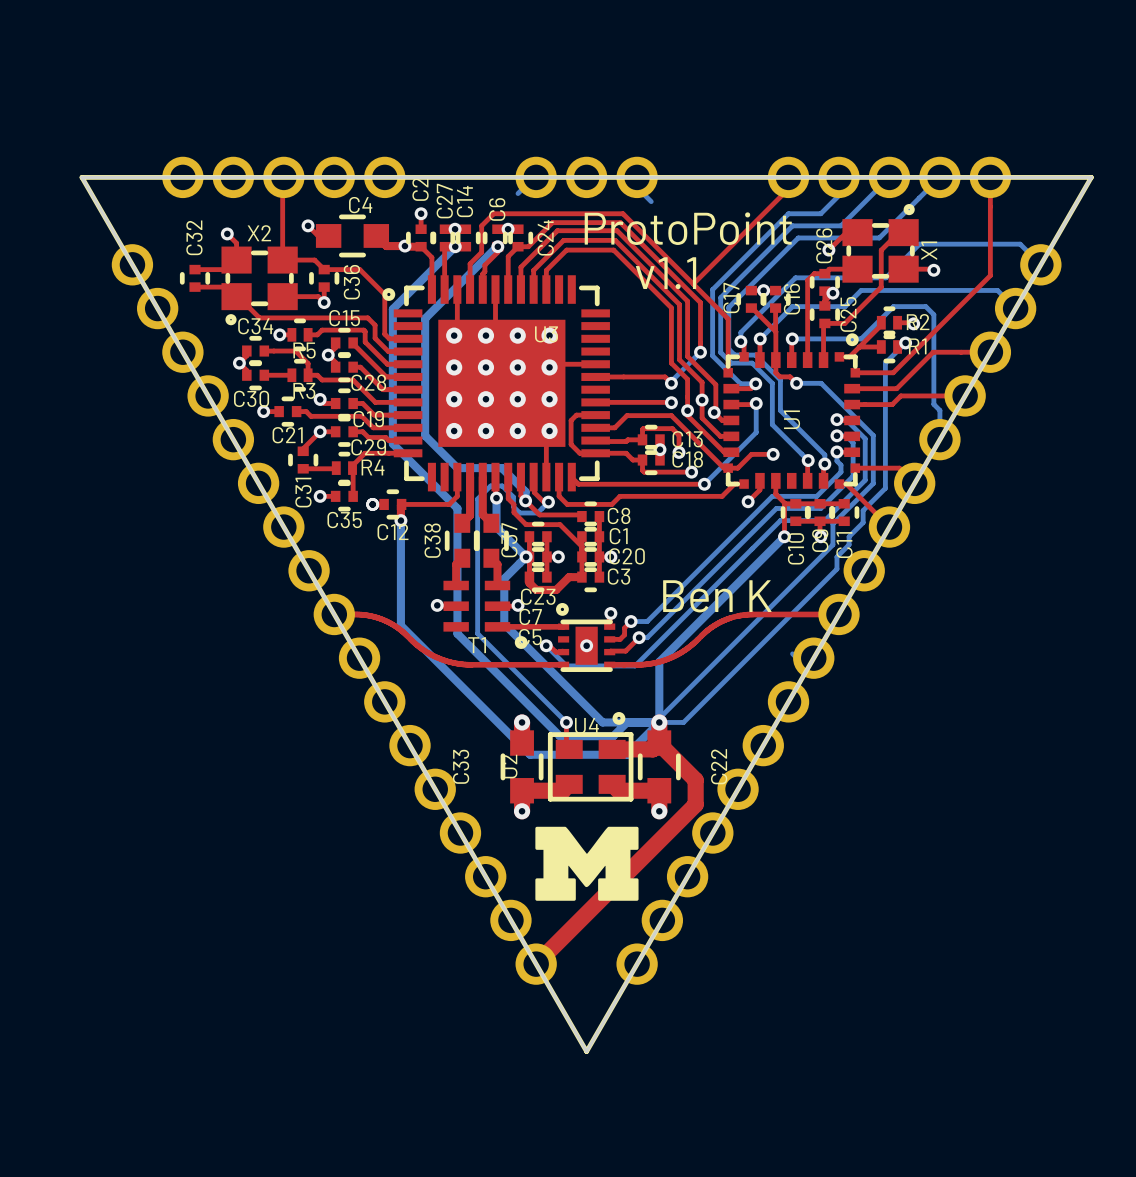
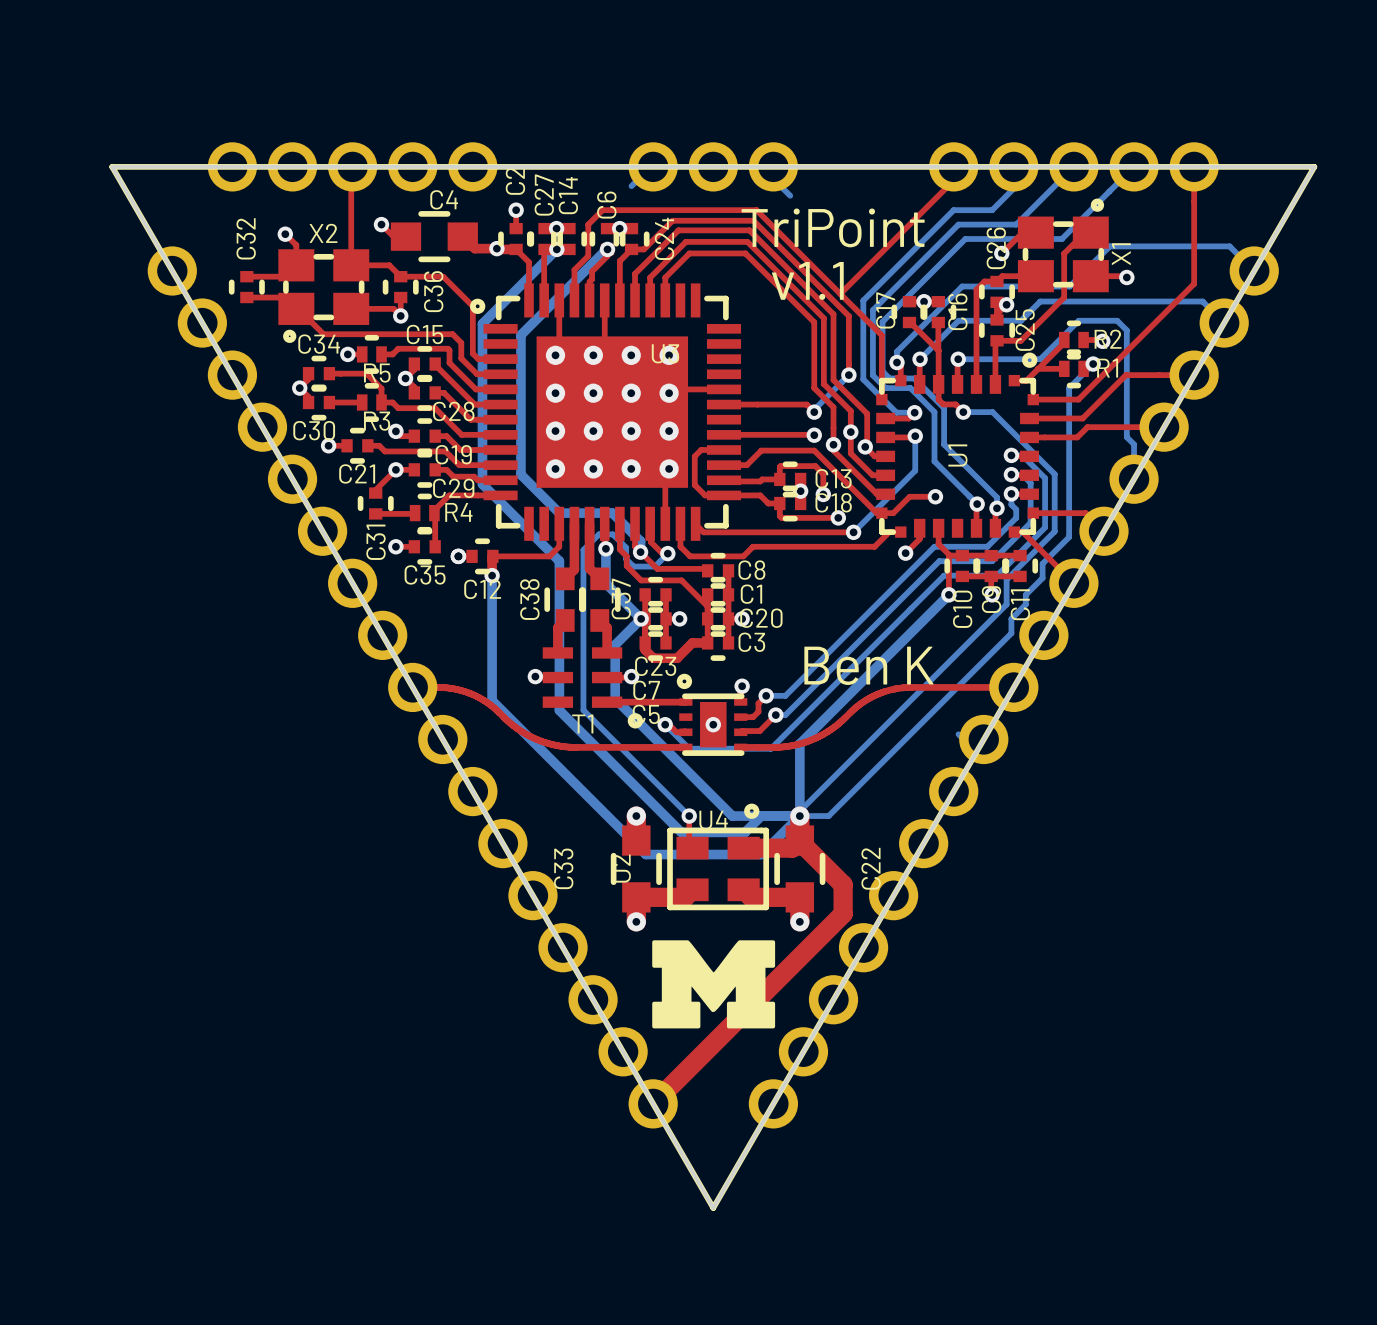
text: ProtoPoint (688, 228) -> TriPoint (833, 227)

